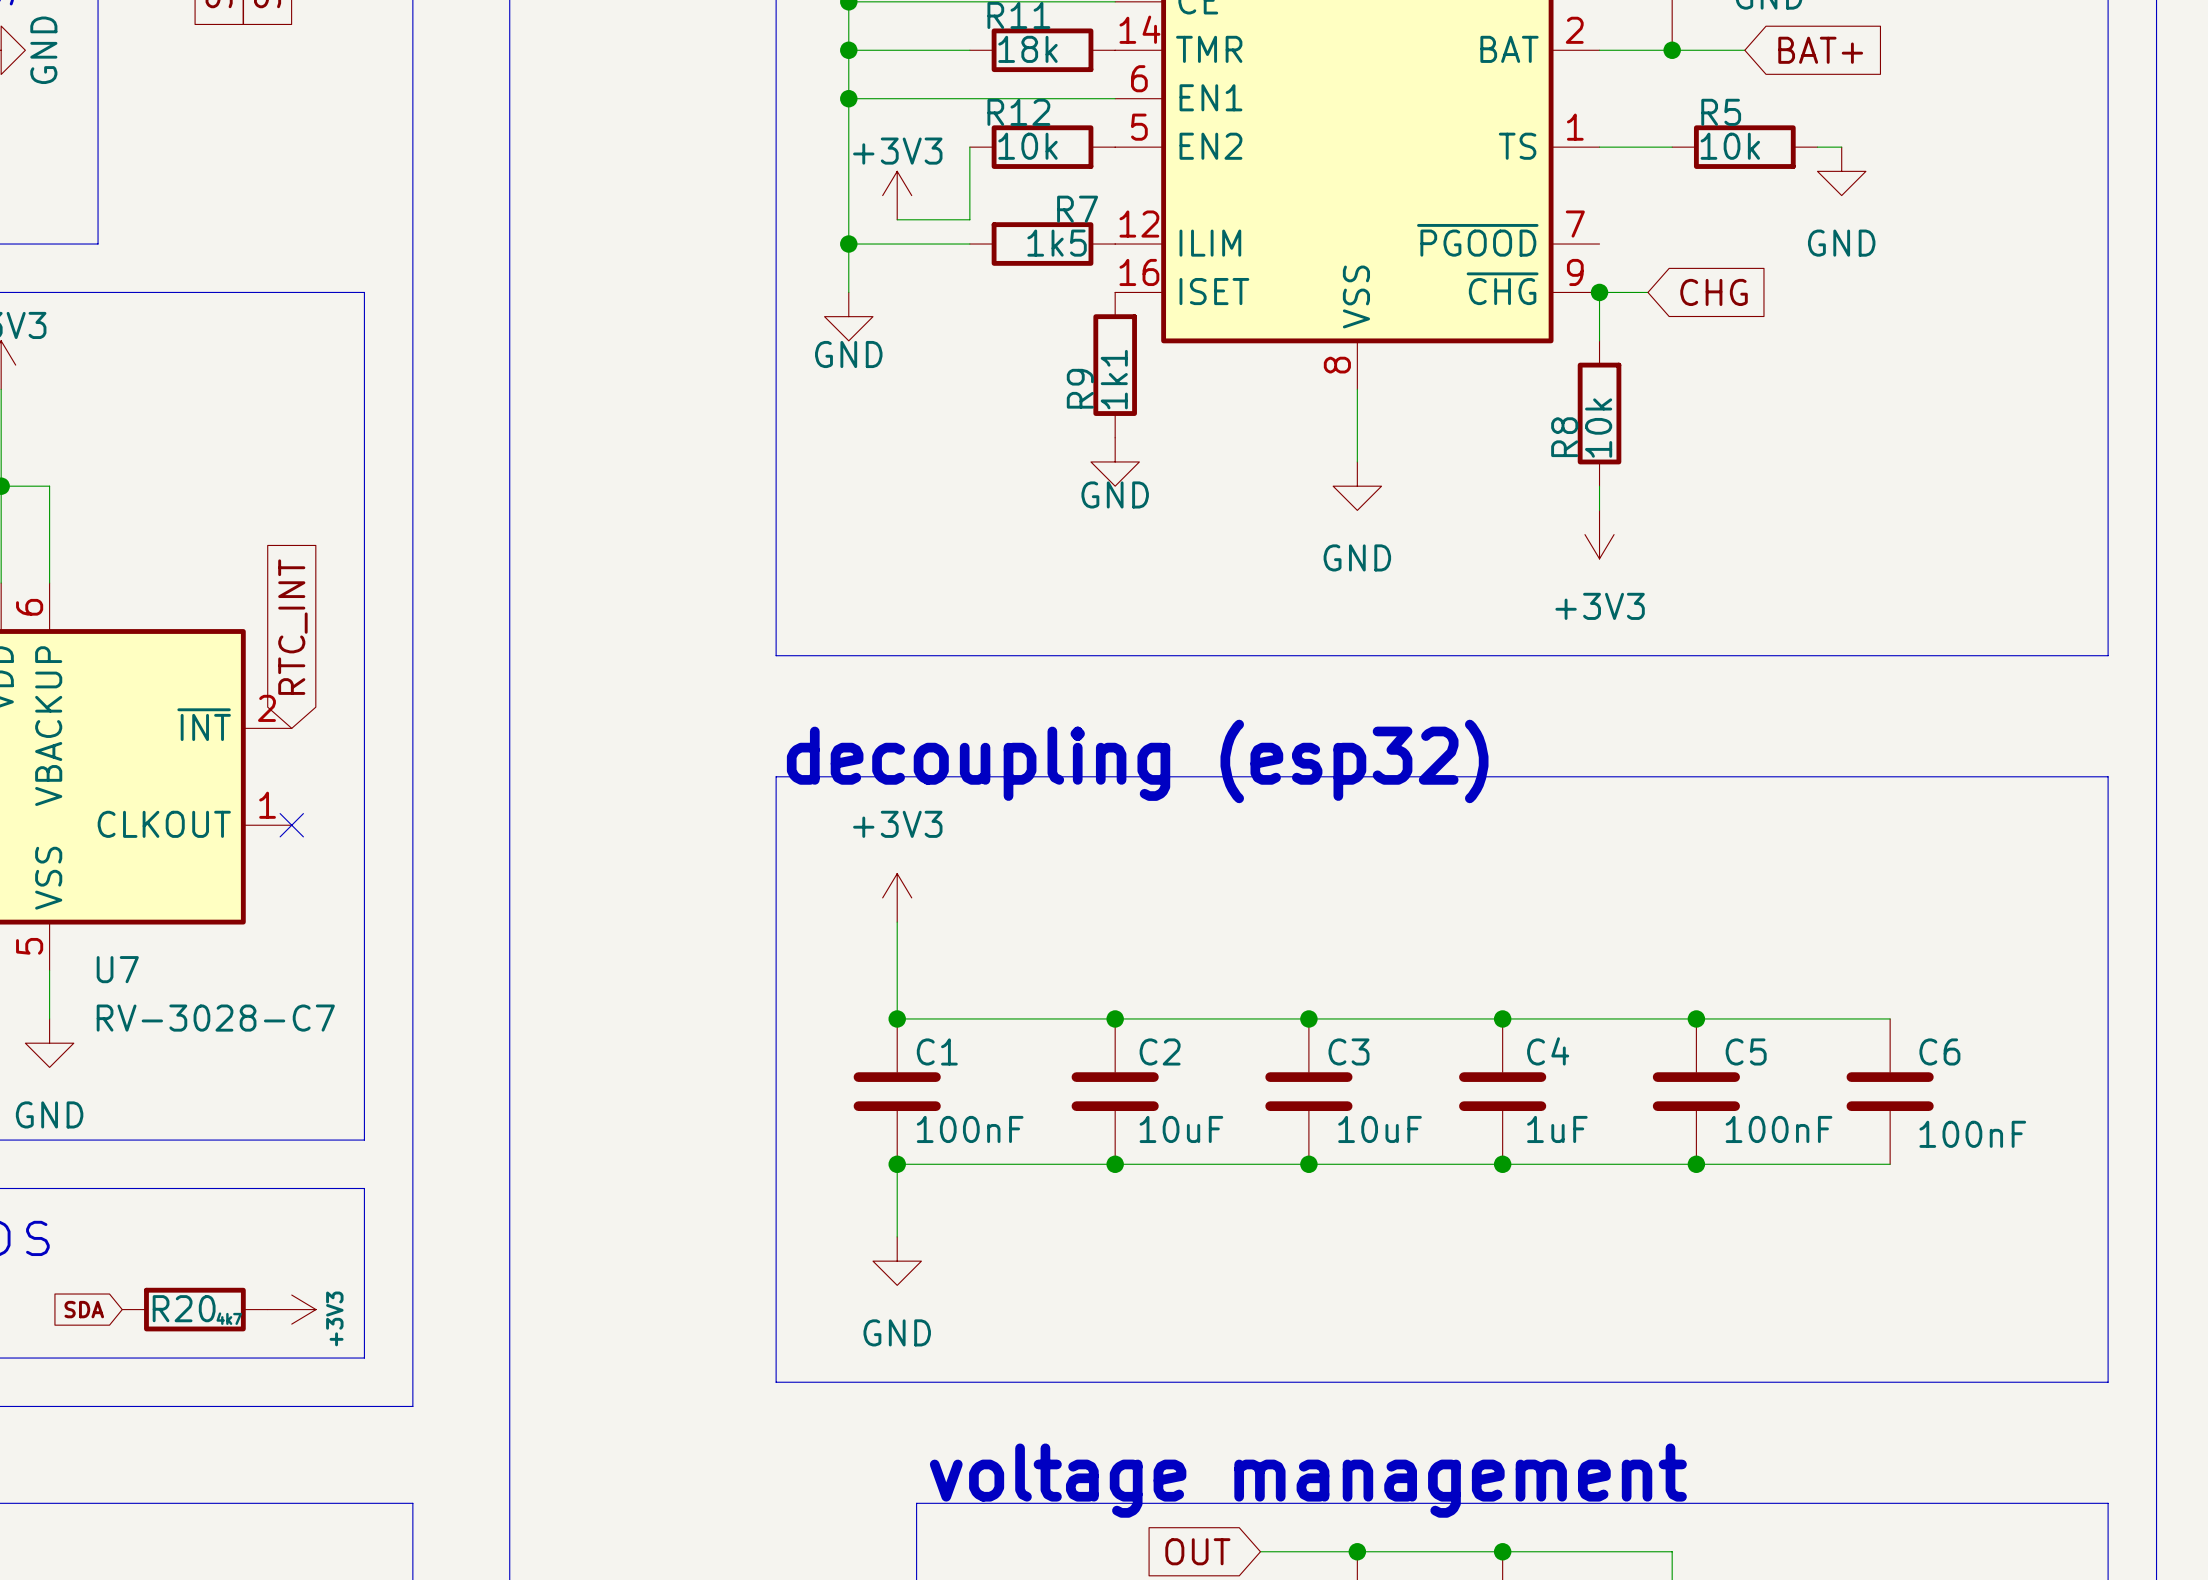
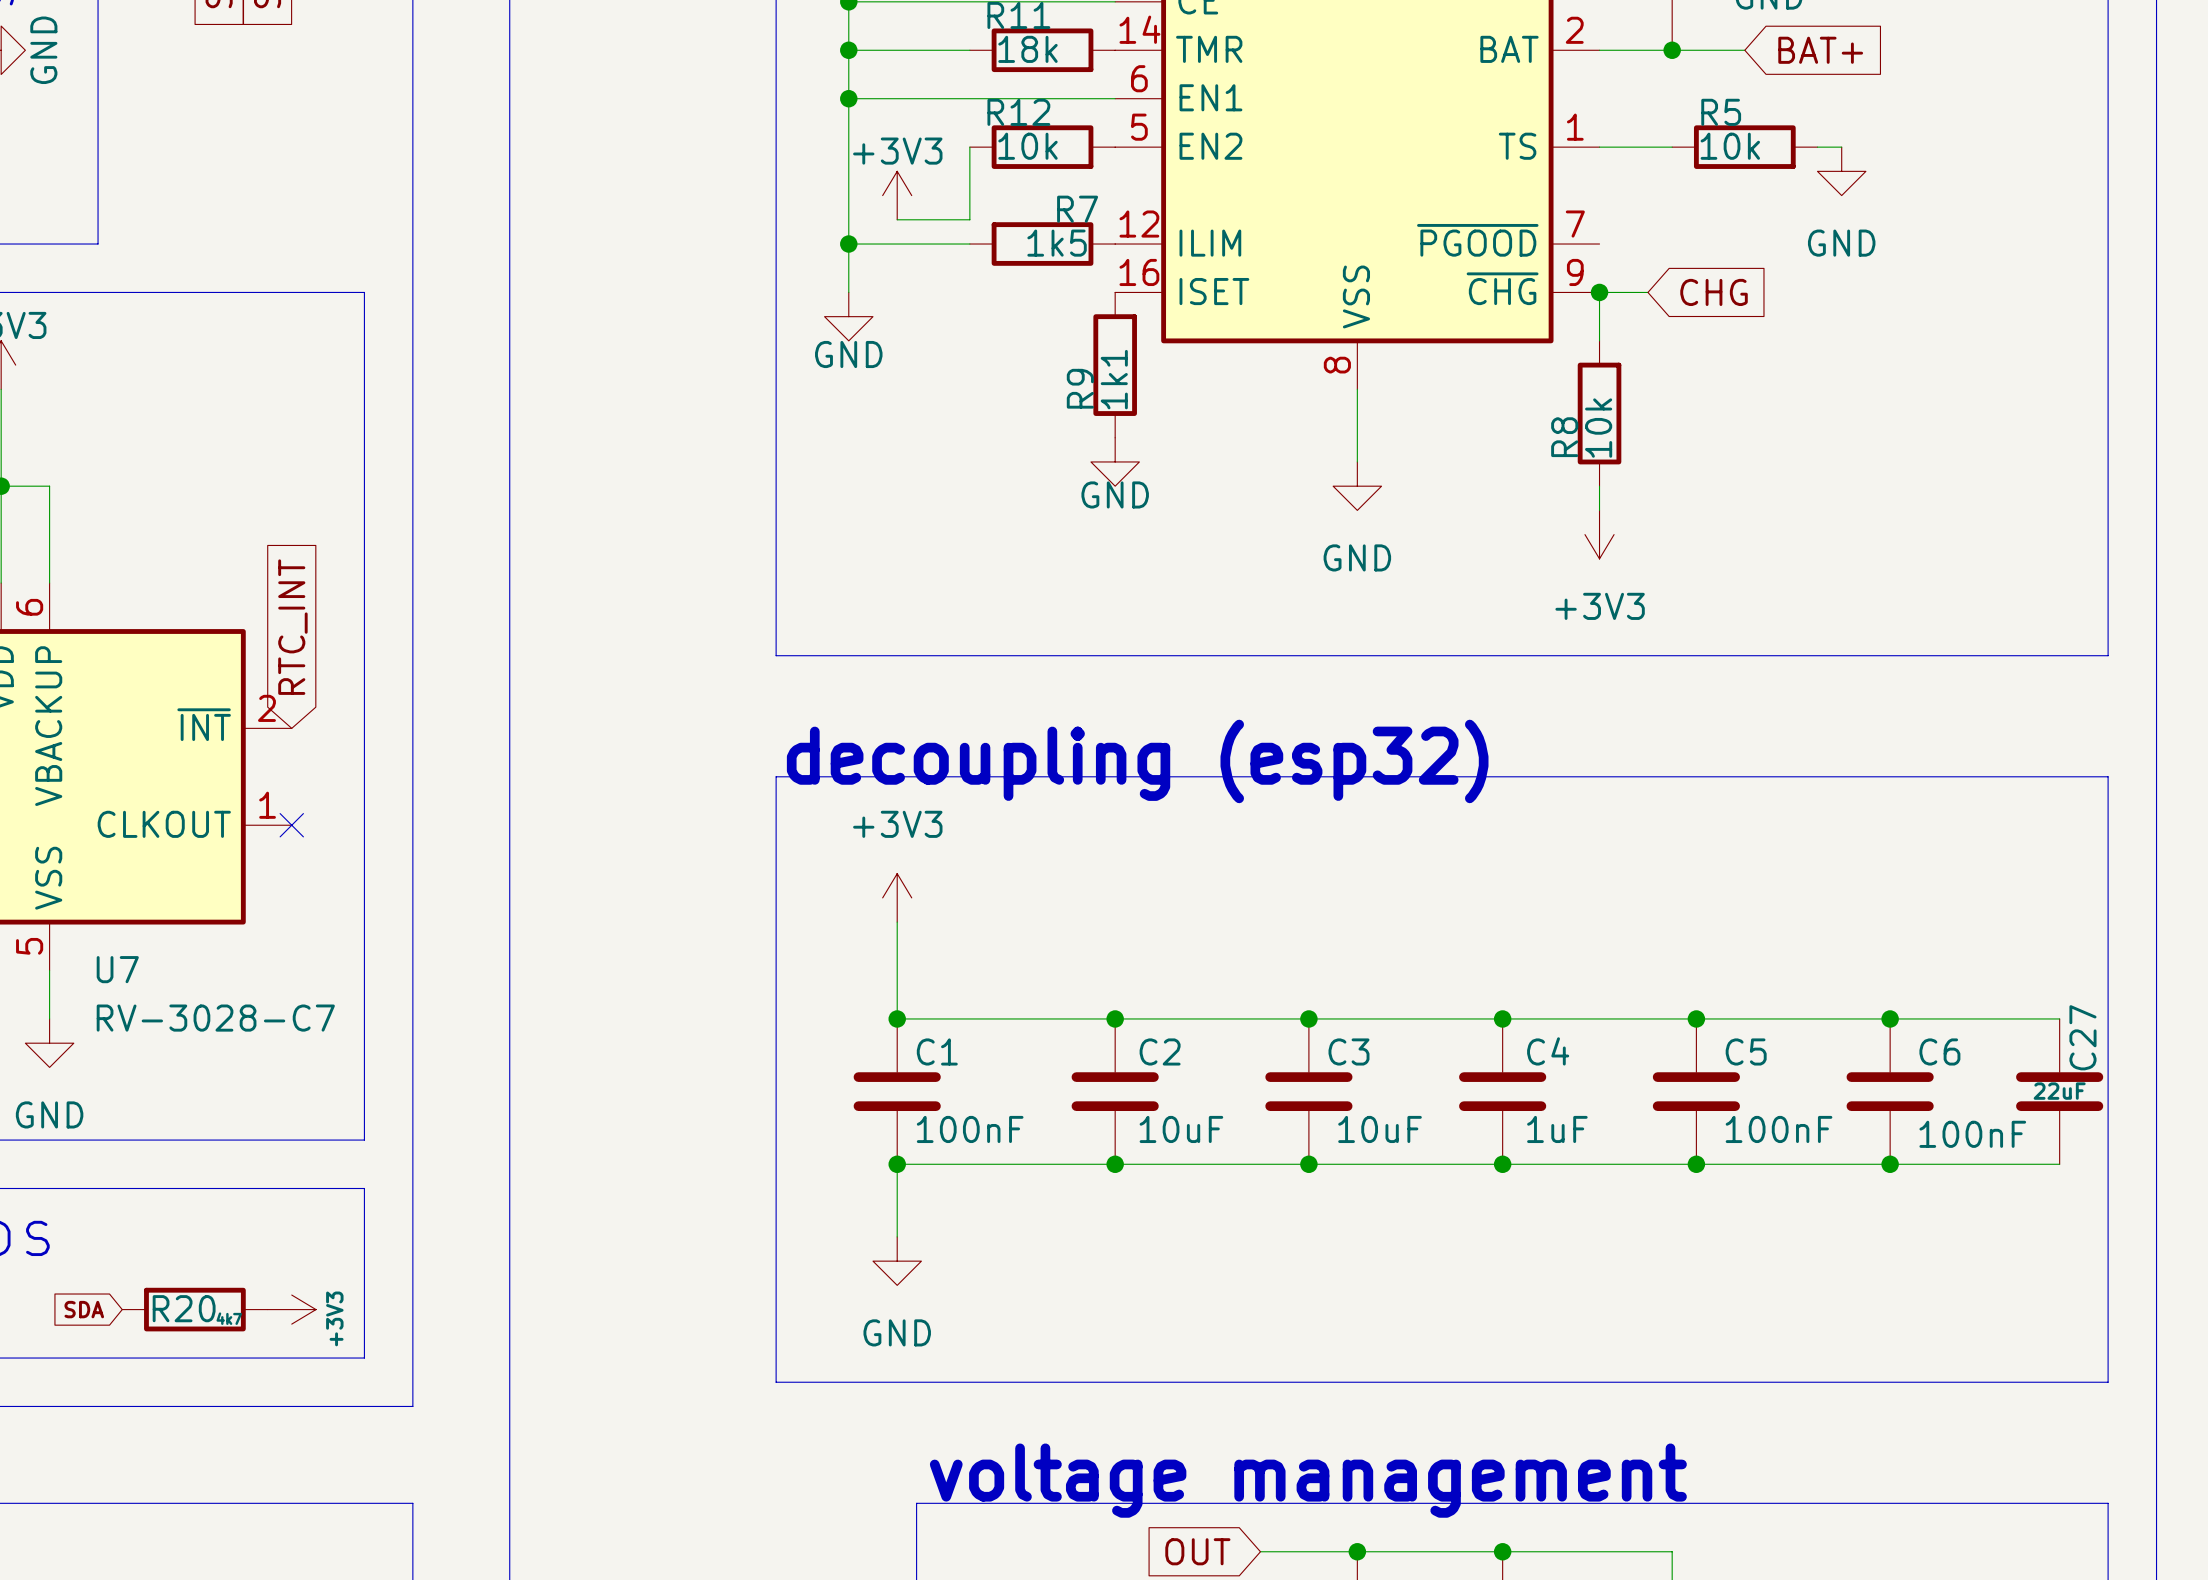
wire: none -> (1890, 1018) (2059, 1018)
junction: none -> (1890, 1018)
C27: none -> 22uF (2059, 1091)
wire: none -> (1890, 1164) (2059, 1164)
junction: none -> (1890, 1164)

